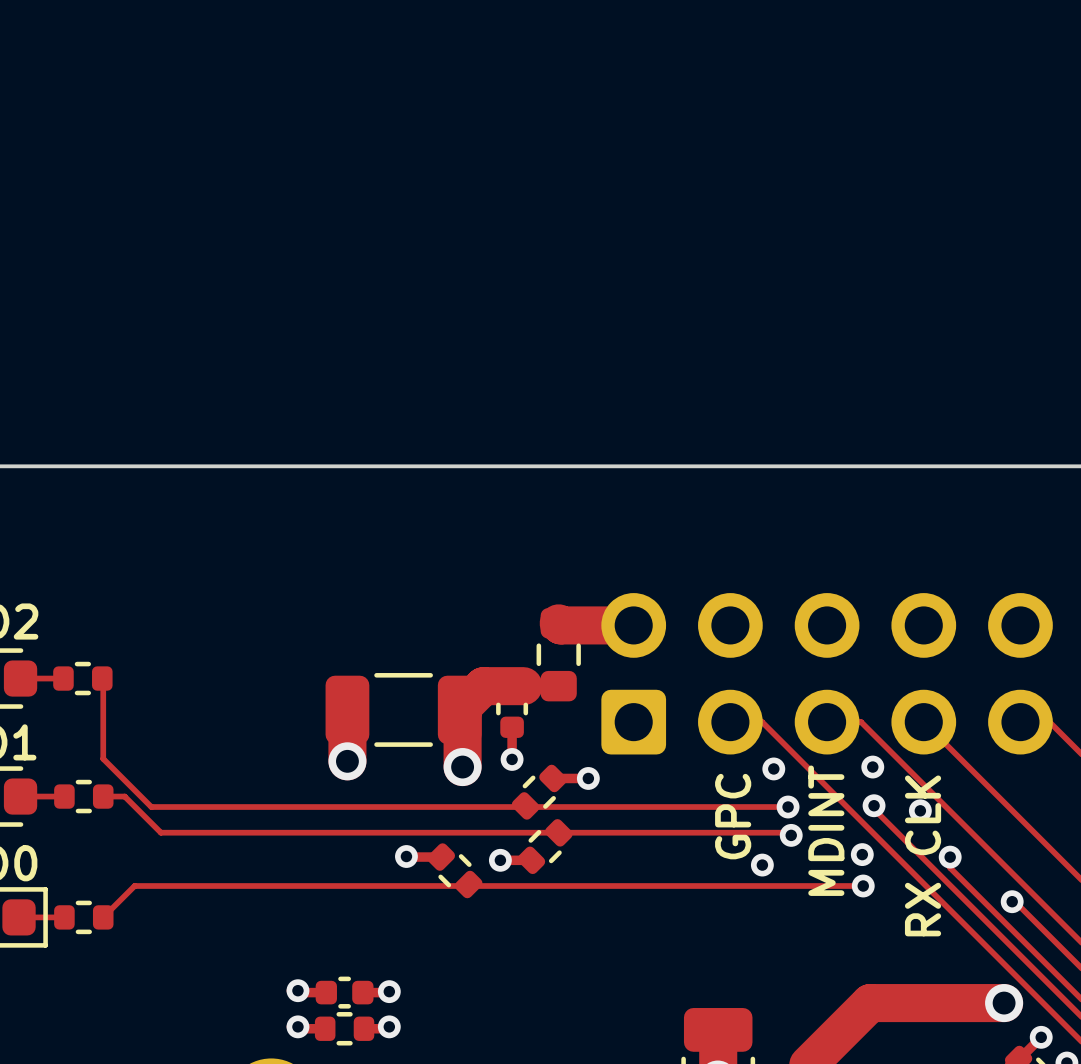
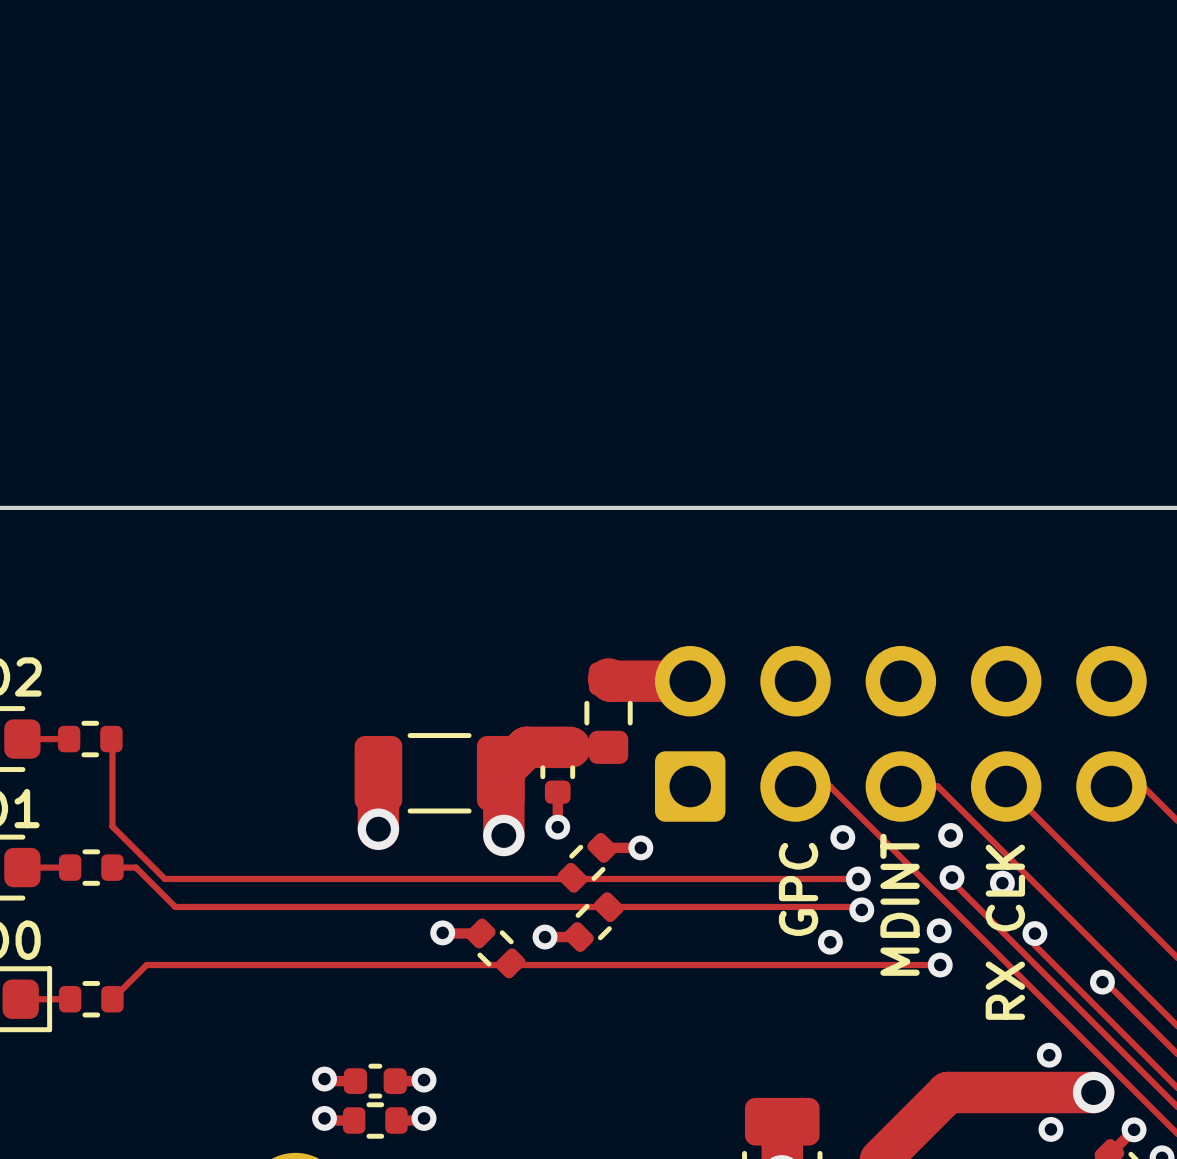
via: none -> (1049, 1055)
via: none -> (1050, 1129)

